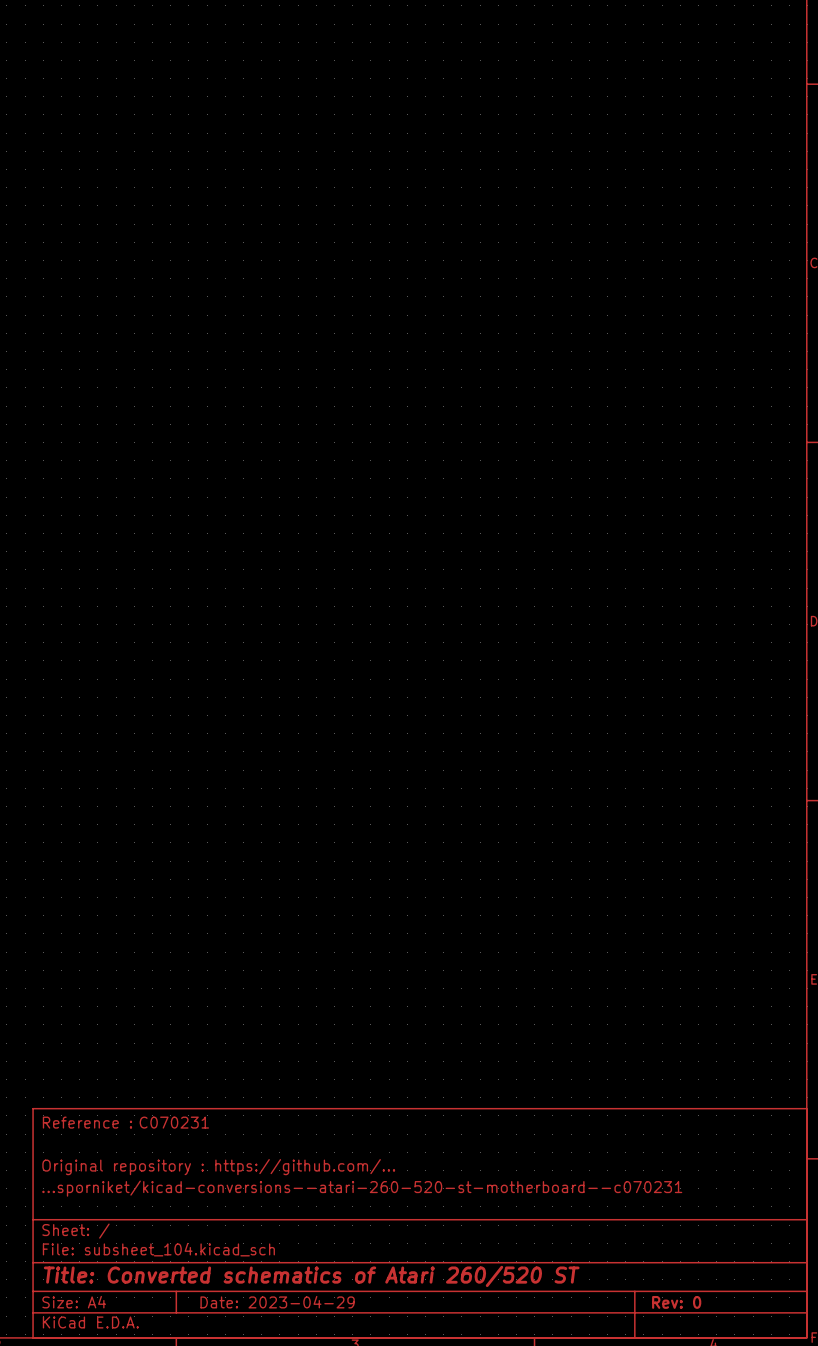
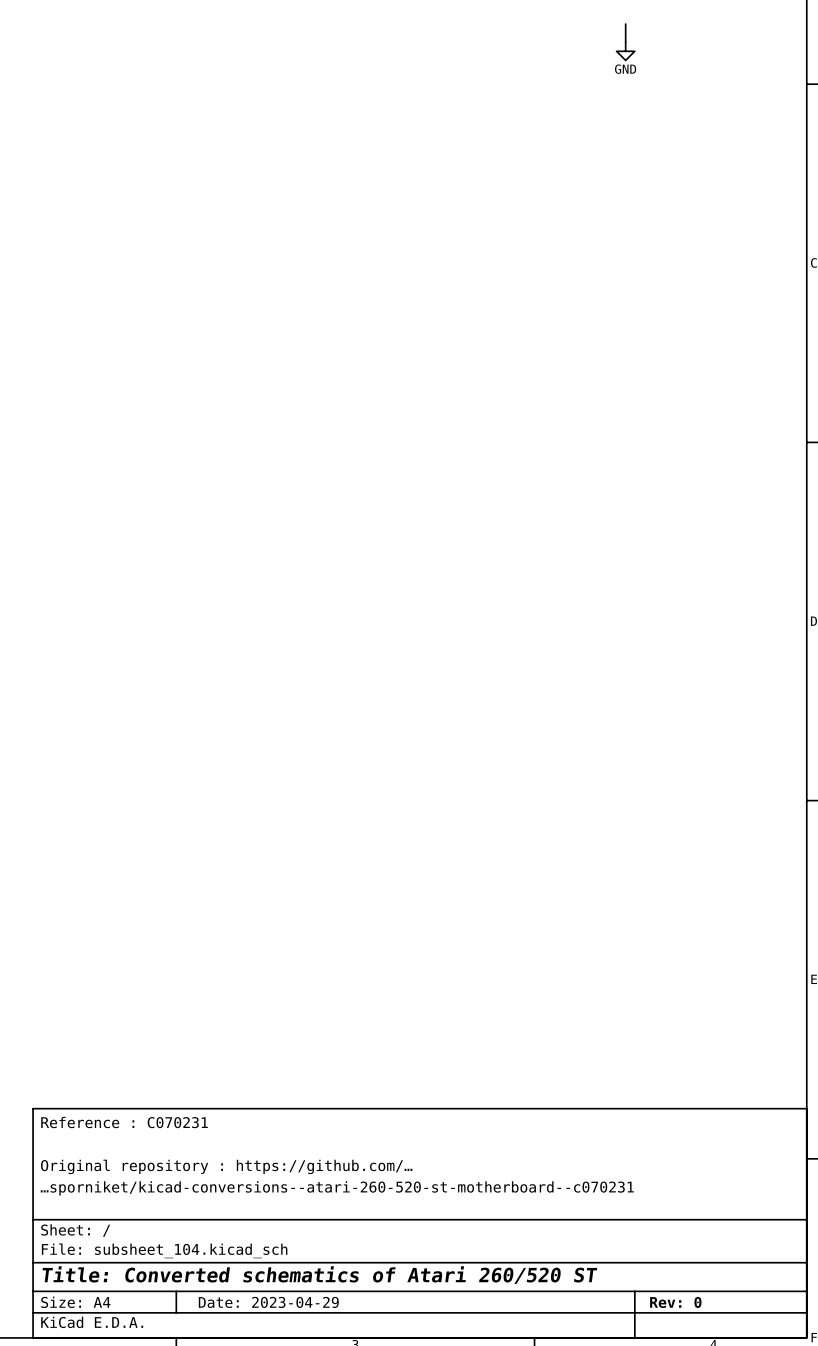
wire: none -> (625, 24) (625, 42)
power symbol: none -> GND (625, 51)

